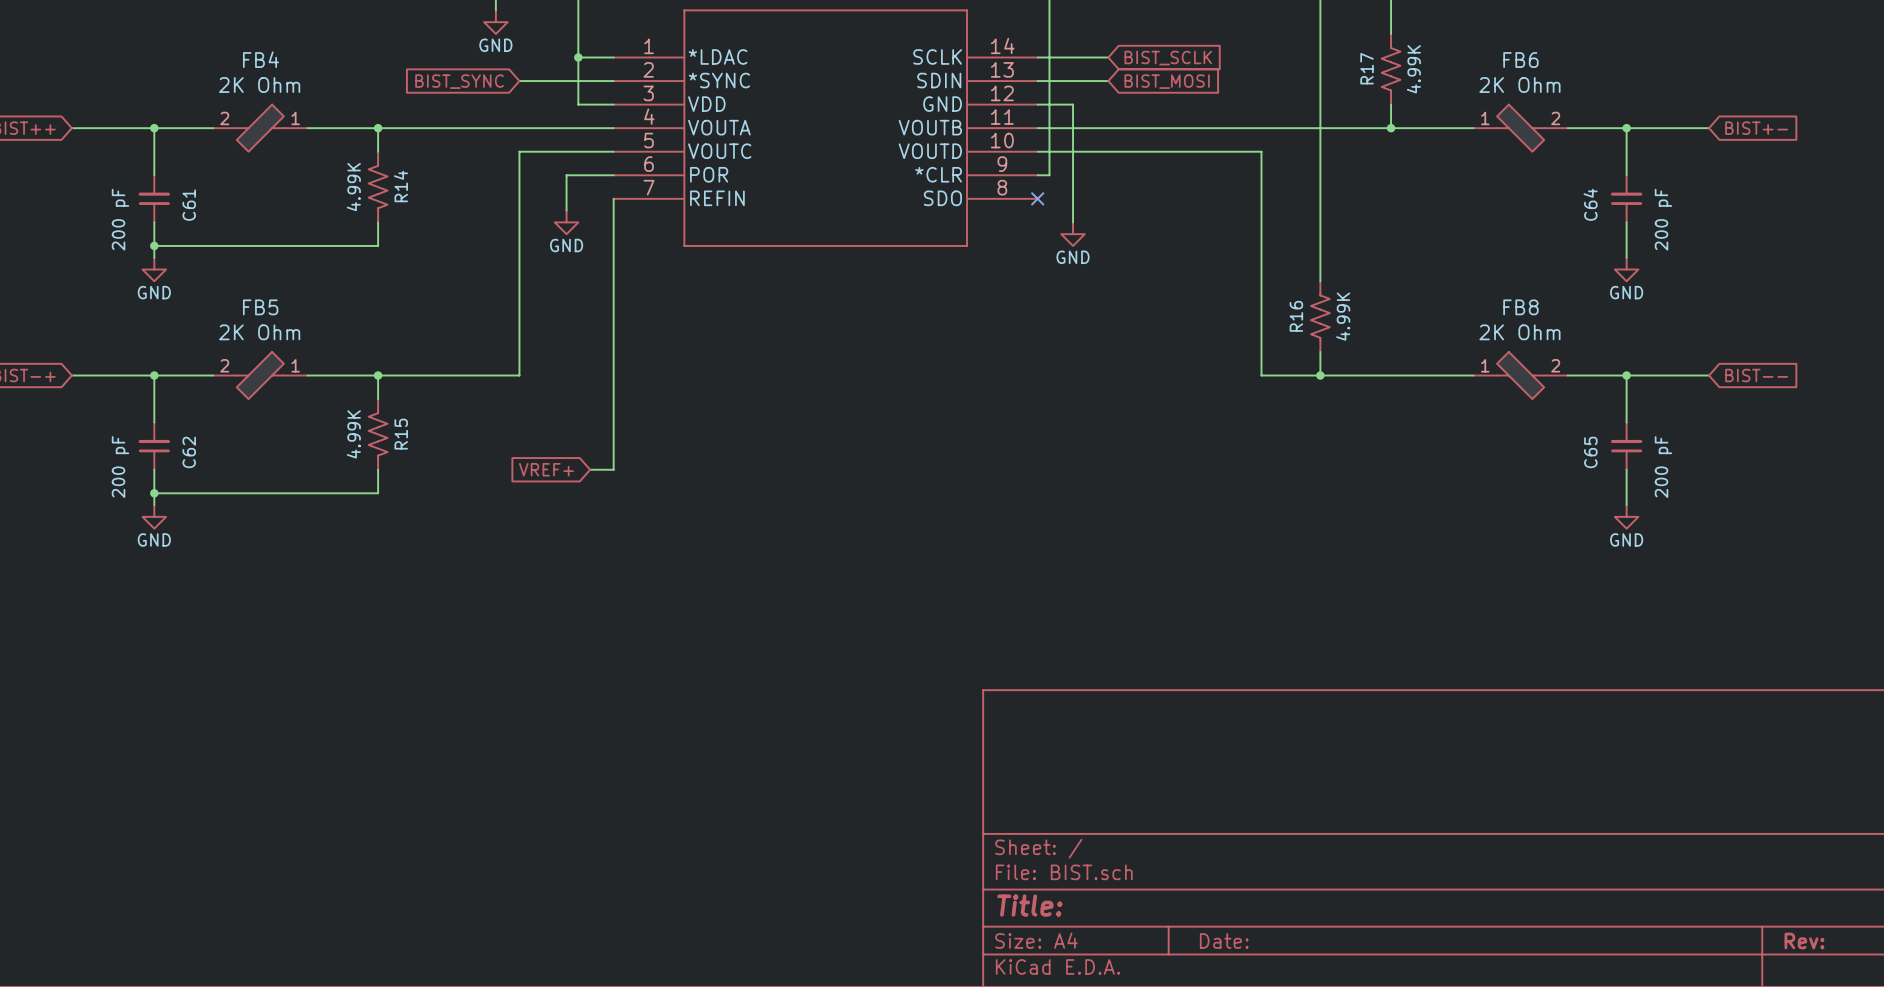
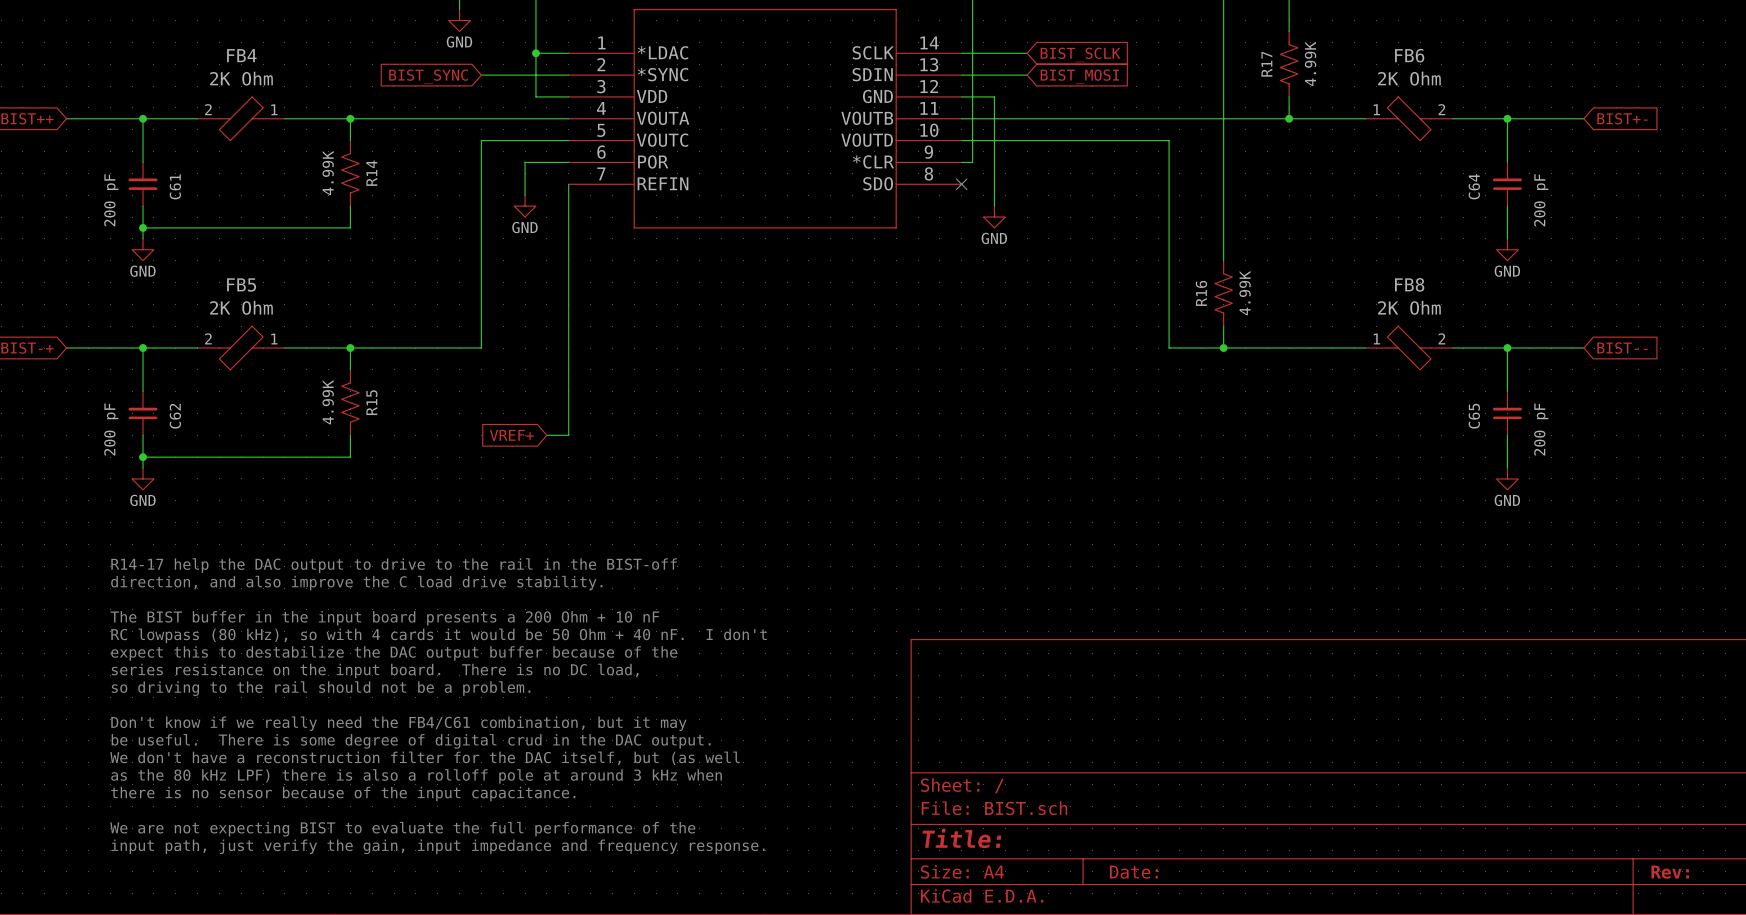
text: none -> R14-17 help the DAC output to drive to the rail in the BIST-off (394, 565)
text: none -> direction, and also improve the C load drive stability. (356, 583)
text: none -> The BIST buffer in the input board presents a 200 Ohm + 10 nF (384, 618)
text: none -> RC lowpass (80 kHz), so with 4 cards it would be 50 Ohm + 40 nF. I don't (439, 635)
text: none -> expect this to destabilize the DAC output buffer because of the (394, 653)
text: none -> series resistance on the input board. There is no DC load, (375, 670)
text: none -> so driving to the rail should not be a problem. (321, 688)
text: none -> Don't know if we really need the FB4/C61 combination, but it may (398, 723)
text: none -> be useful. There is some degree of digital crud in the DAC output. (411, 741)
text: none -> We don't have a reconstruction filter for the DAC itself, but (as well (425, 758)
text: none -> as the 80 kHz LPF) there is also a rolloff pole at around 3 kHz when (416, 776)
text: none -> there is no sensor because of the input capacitance. (343, 794)
text: none -> We are not expecting BIST to evaluate the full performance of the (402, 829)
text: none -> input path, just verify the gain, input impedance and frequency response. (438, 846)

